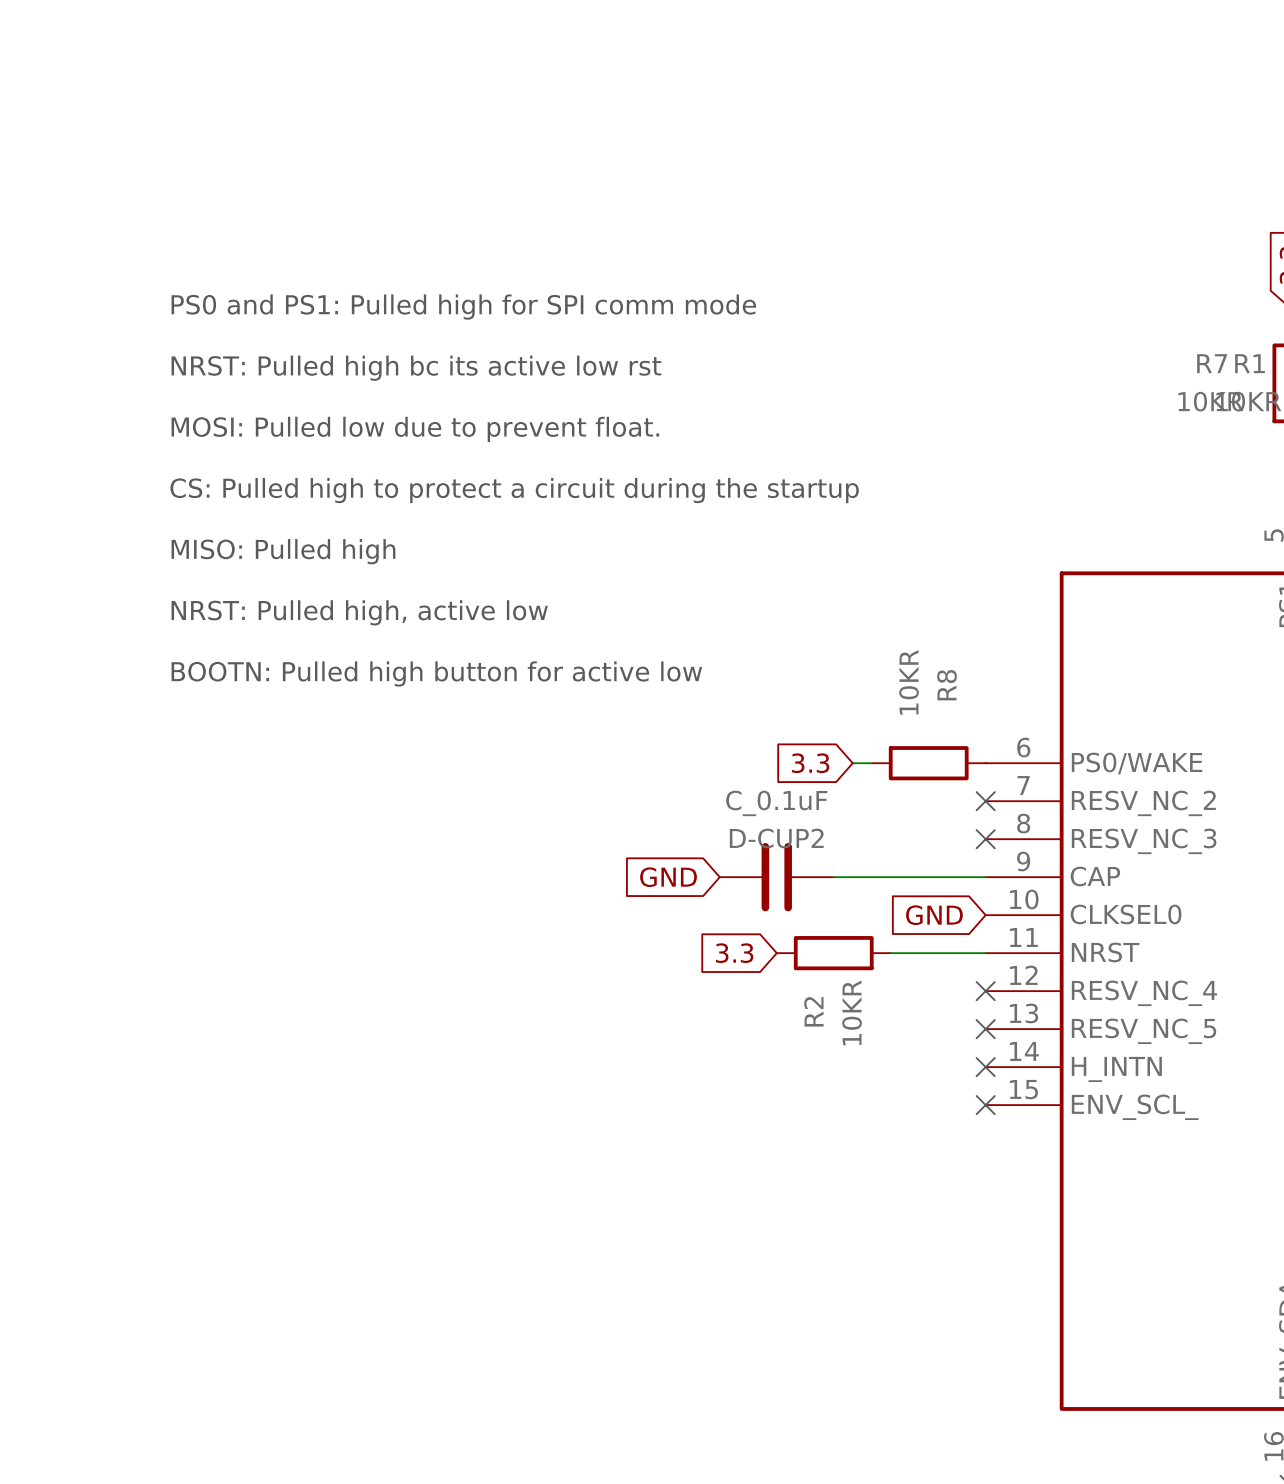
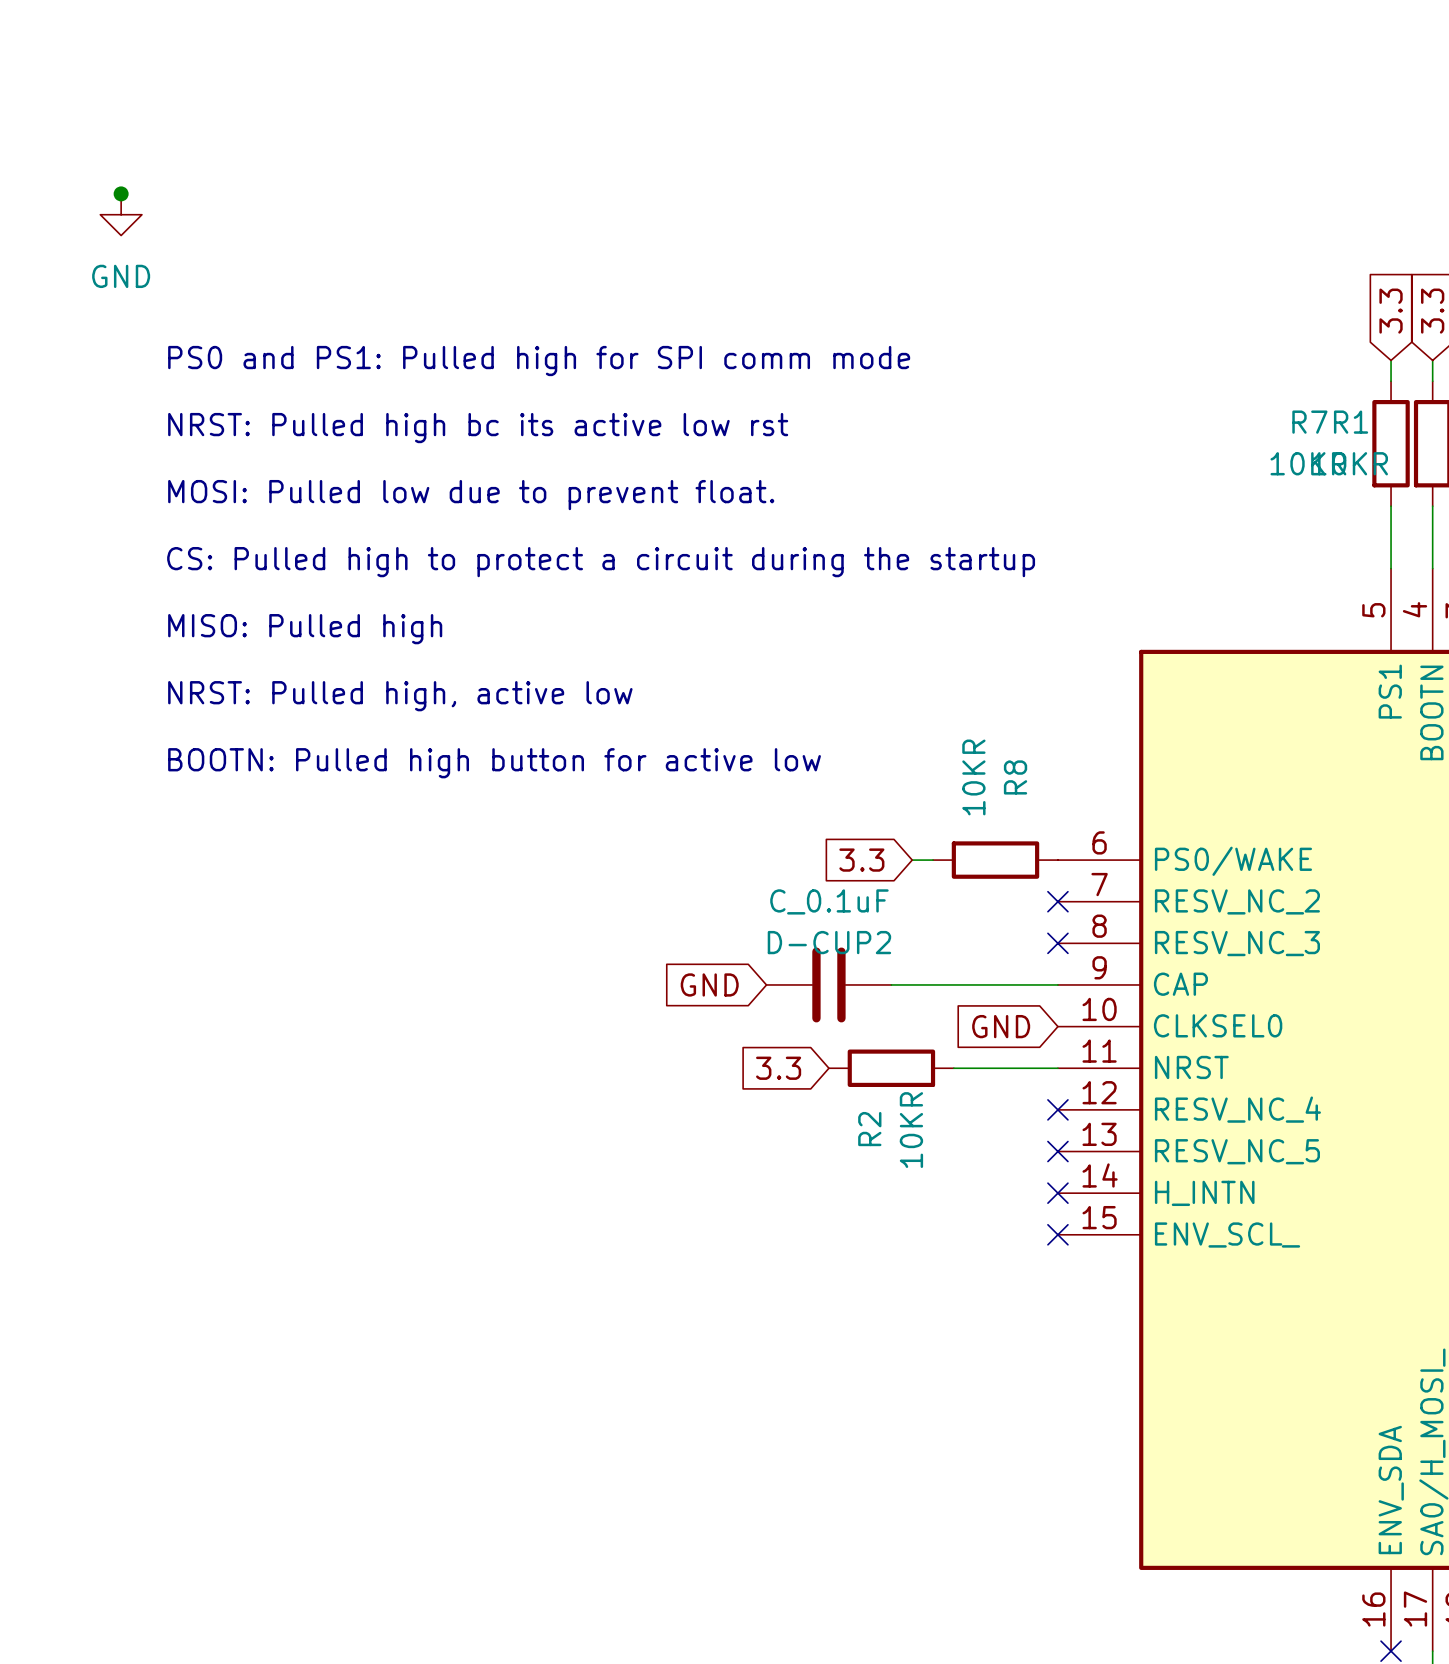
junction: none -> (121, 193)
power symbol: none -> GND (121, 214)

